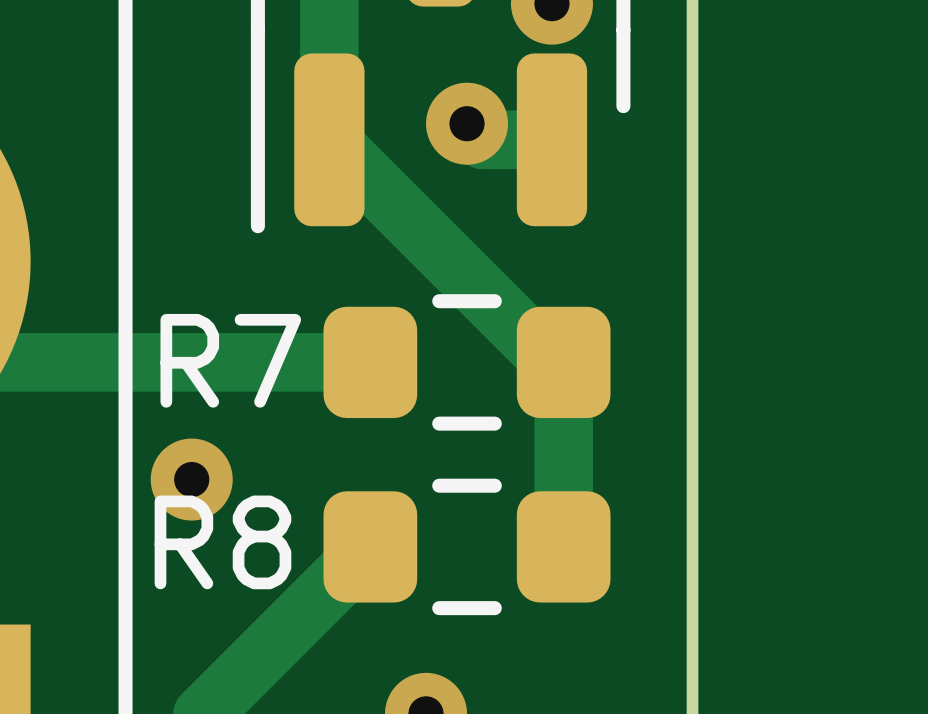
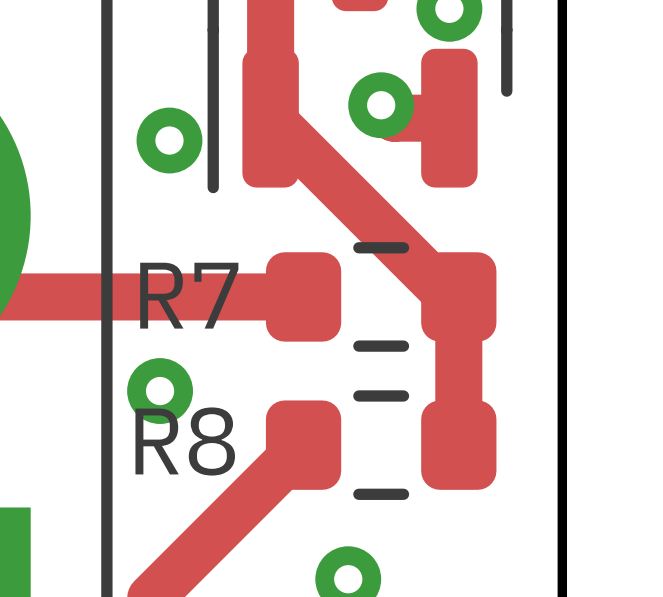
via: none -> (169, 140)

